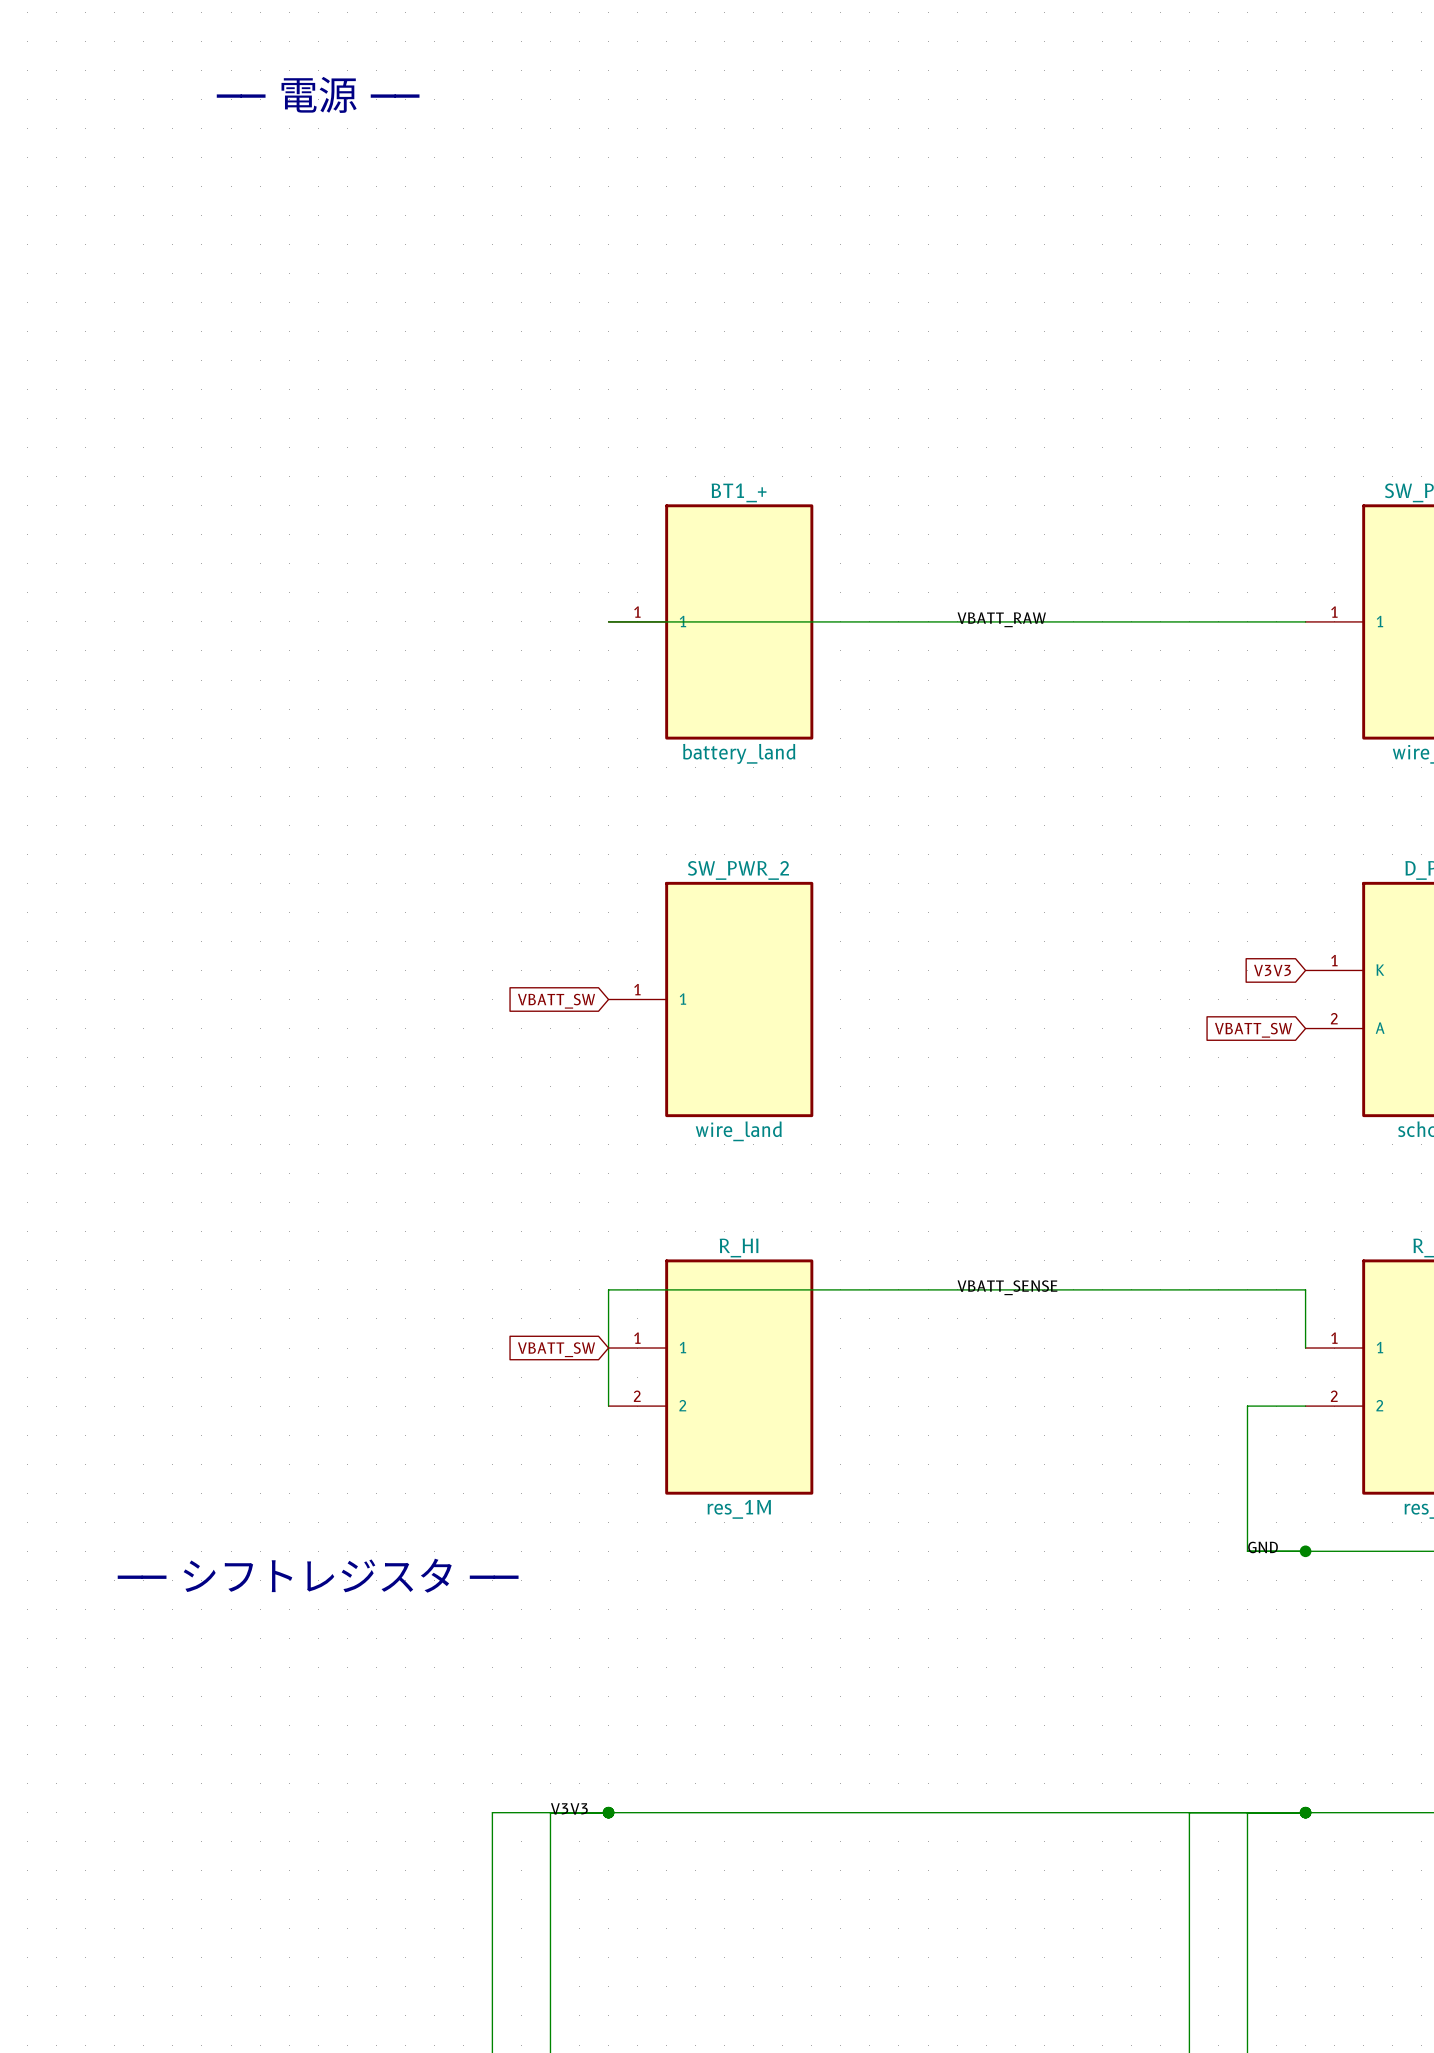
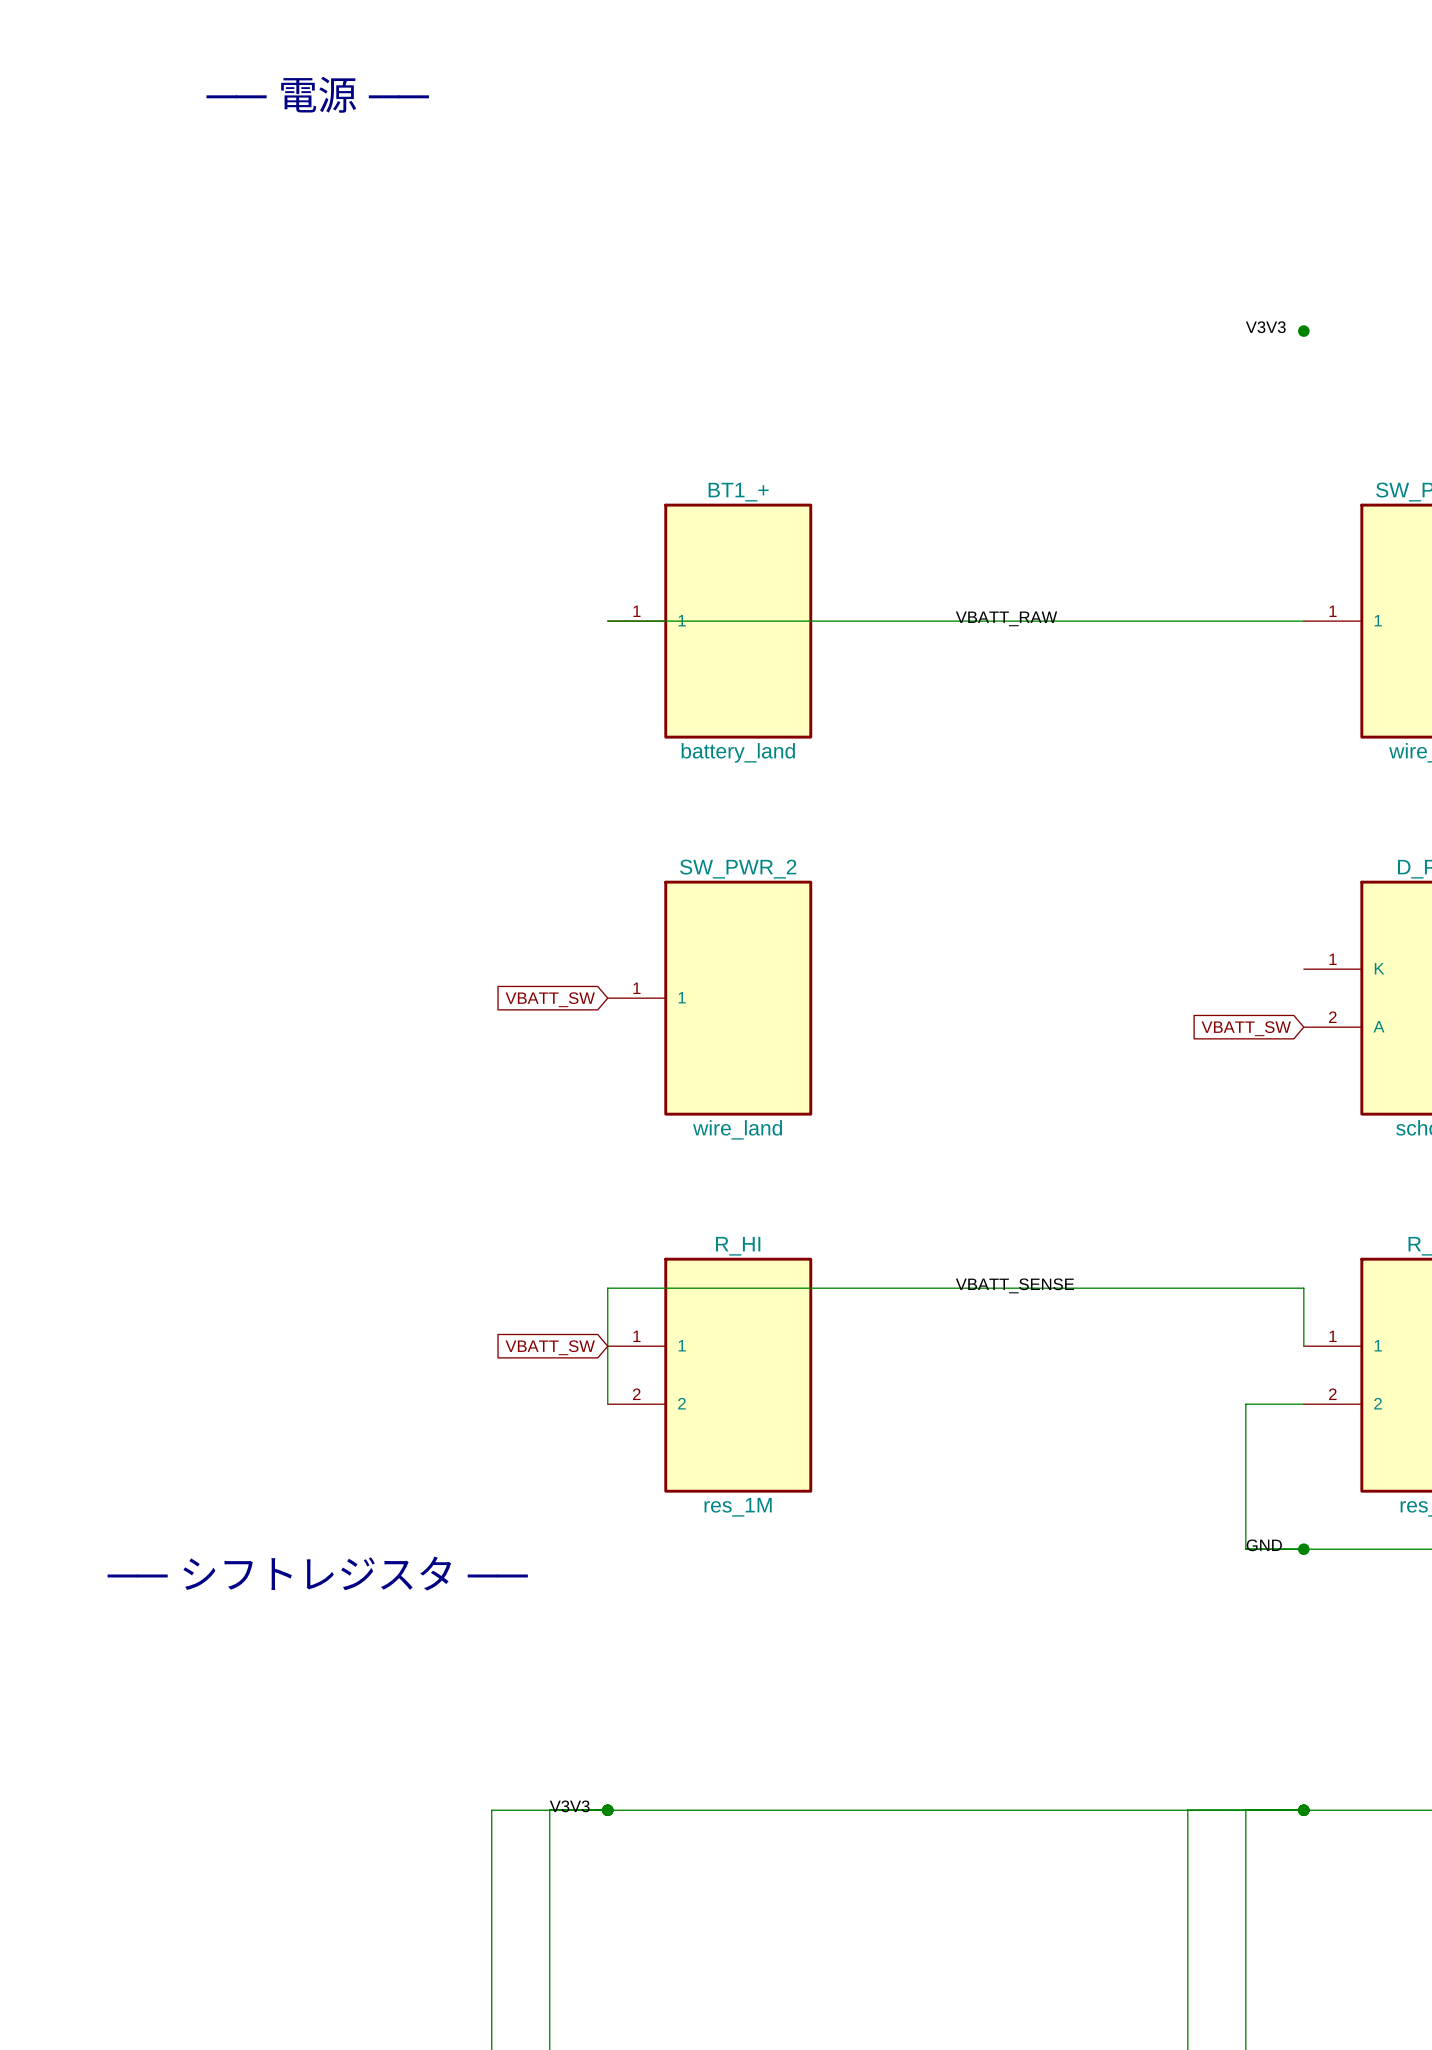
label: none -> V3V3 (1265, 327)
junction: none -> (1303, 331)
global label: V3V3 (1272, 970) -> none

